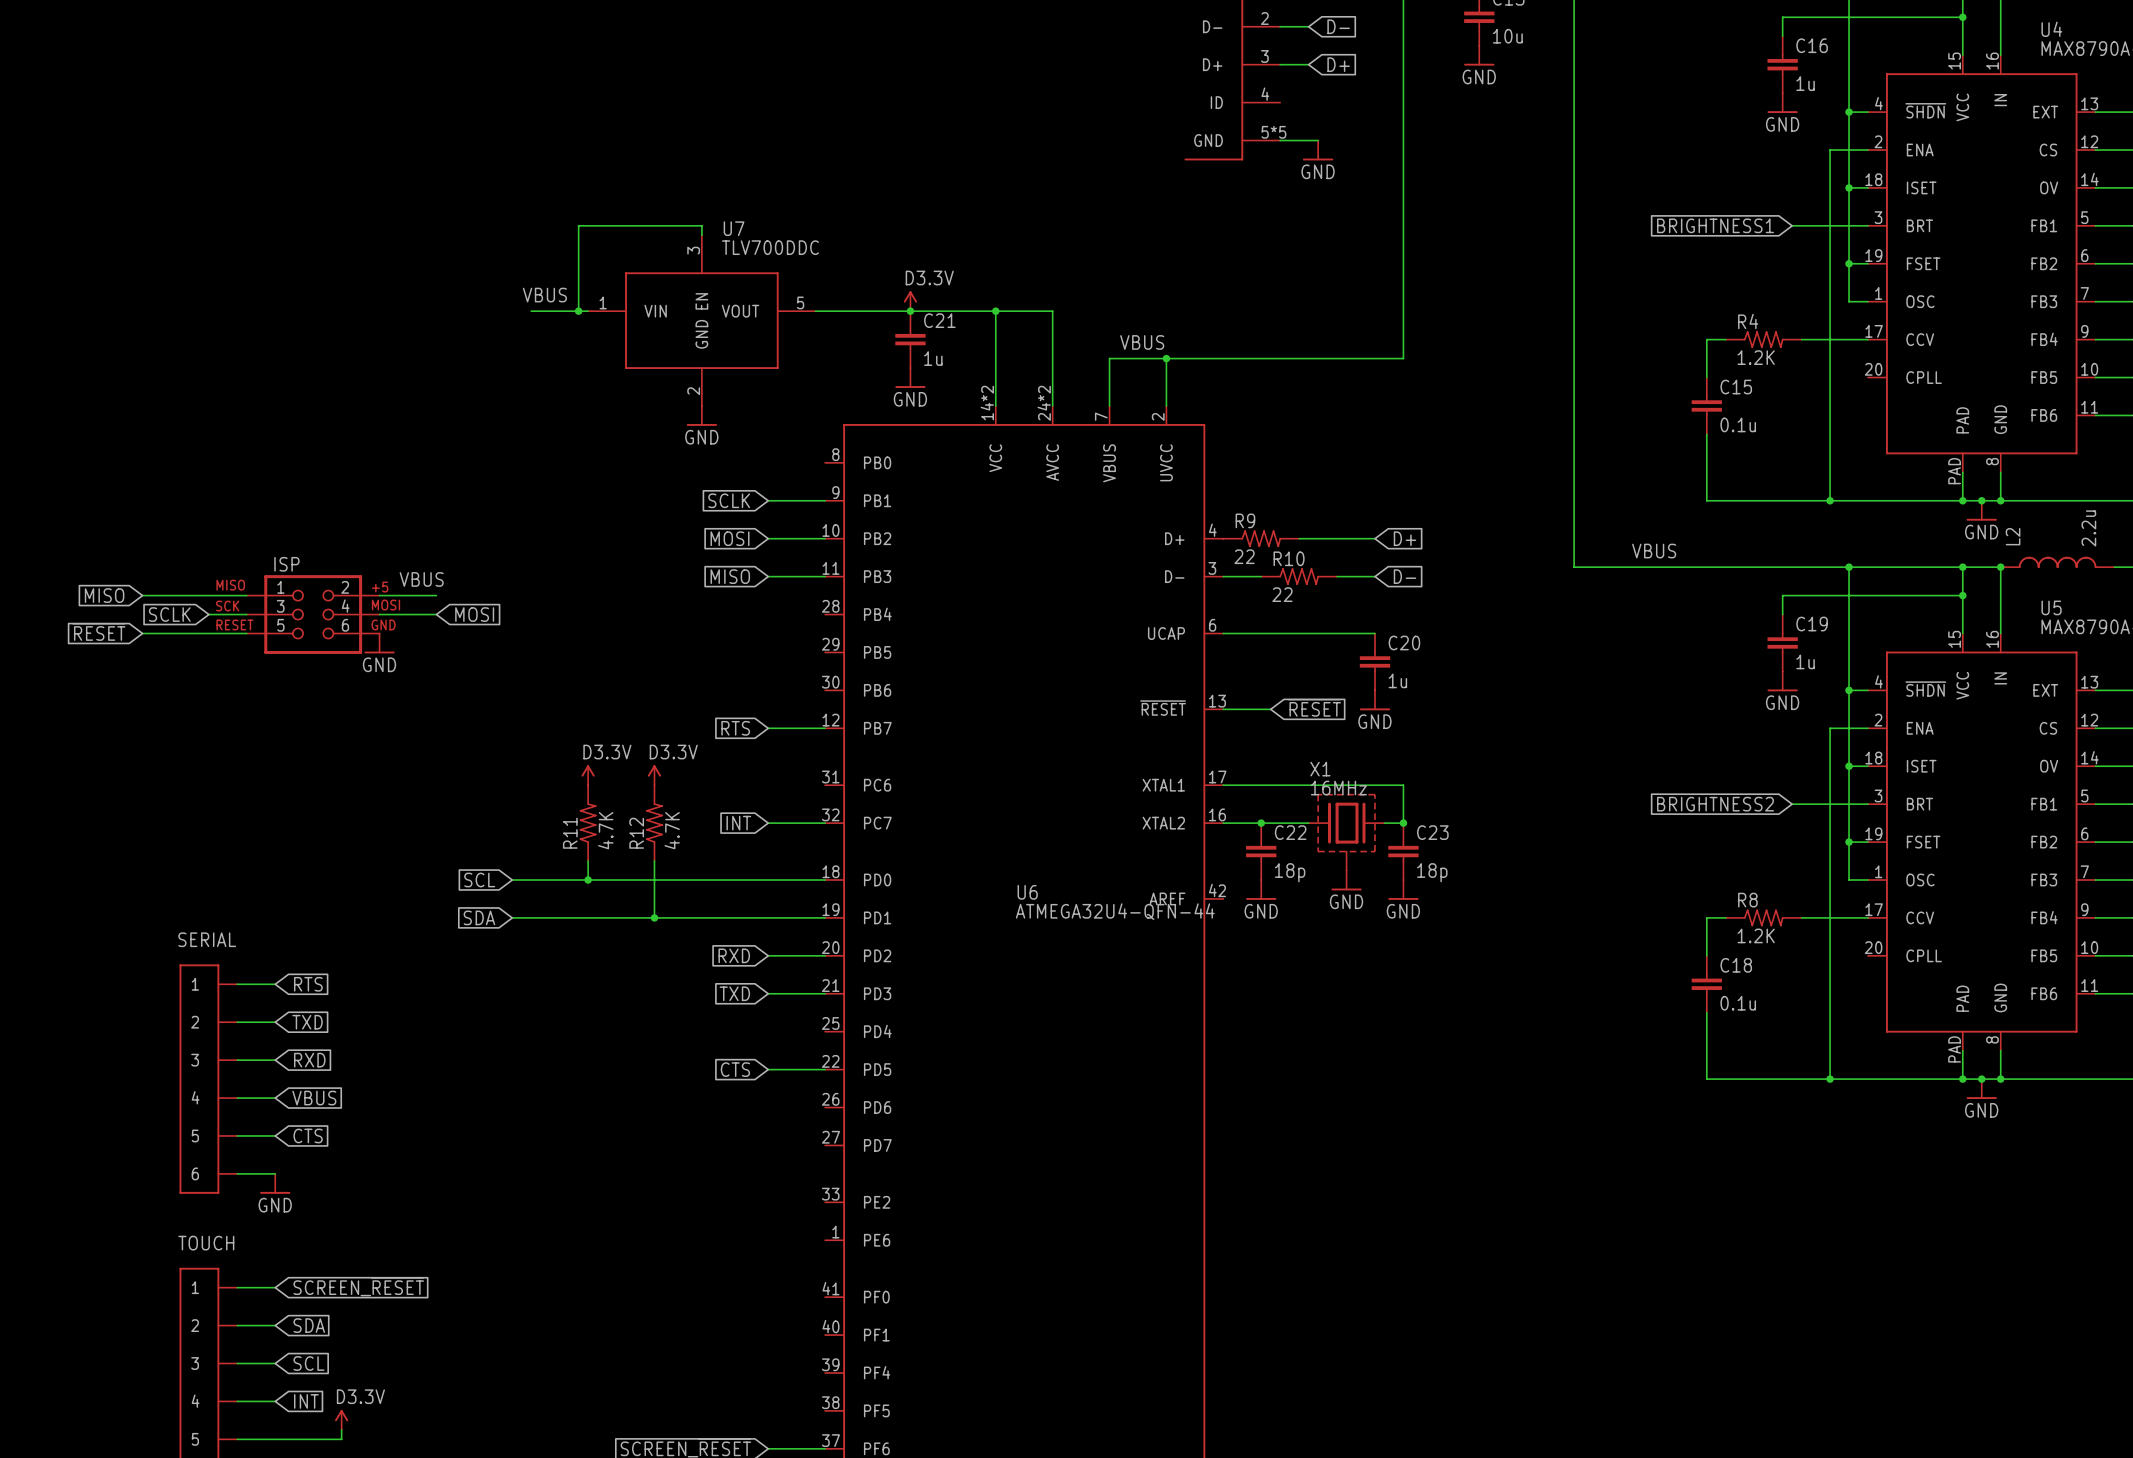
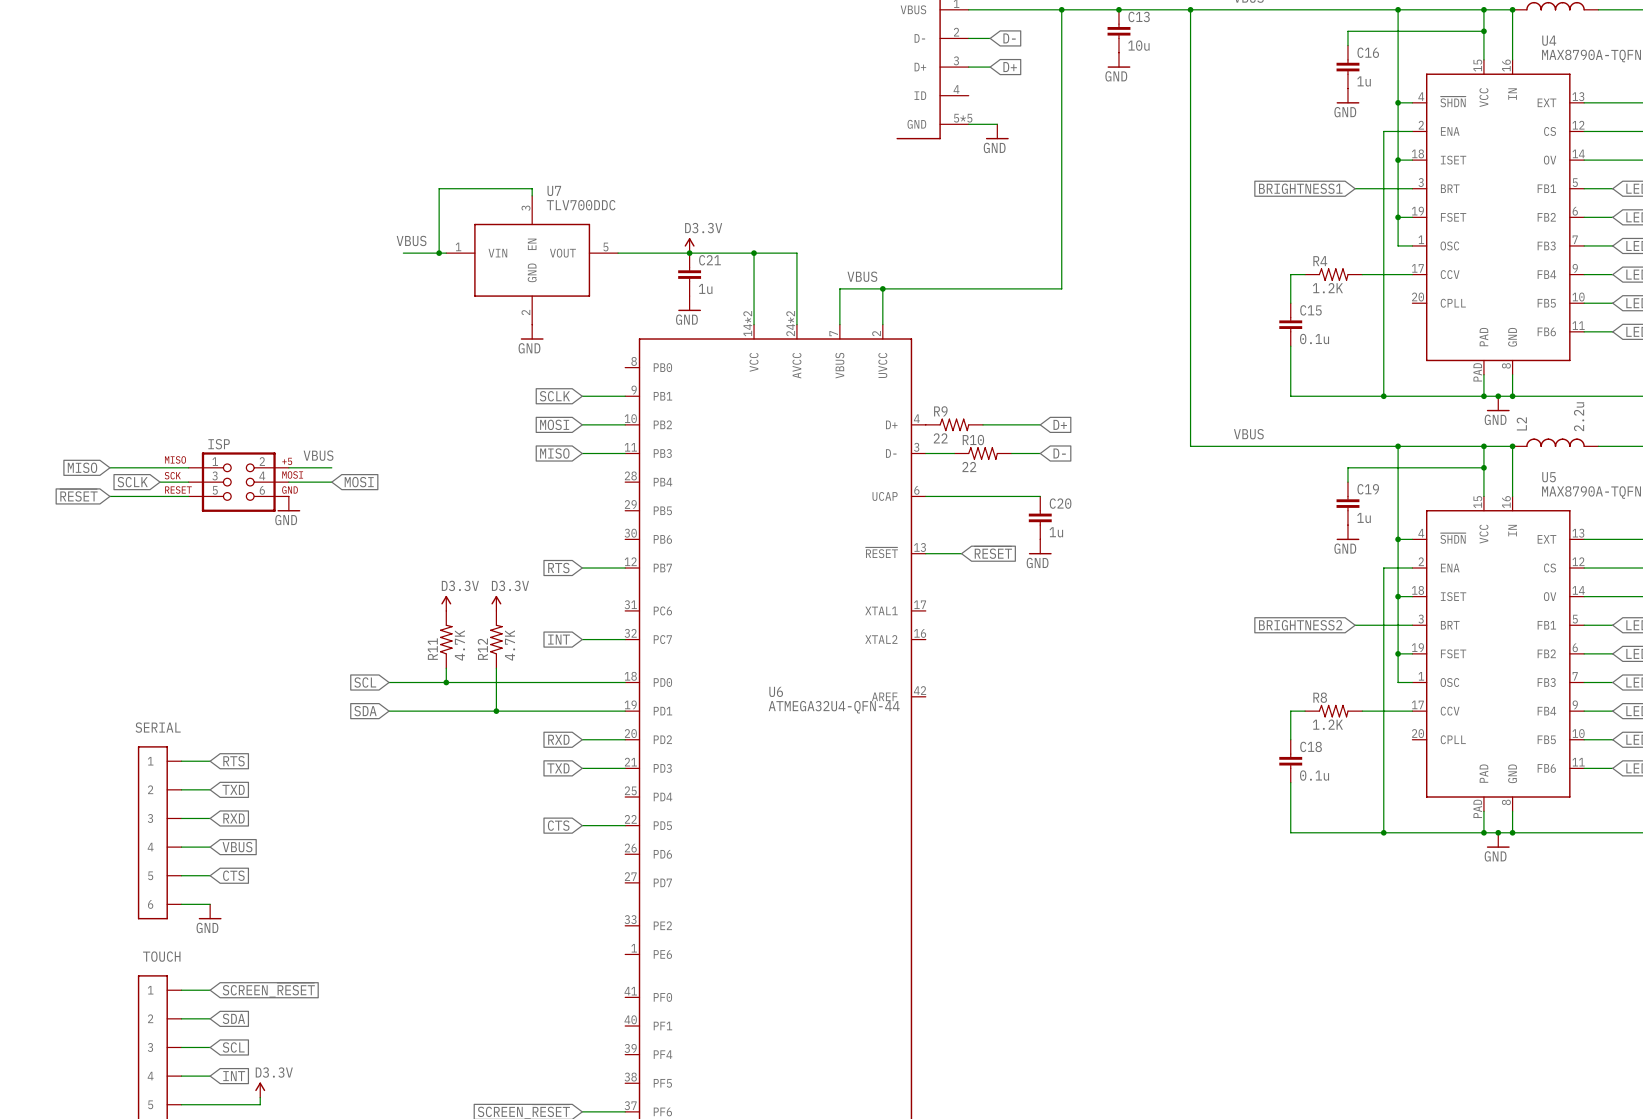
wire: (1223, 785) (1403, 785) (1403, 823) (1384, 823) -> none
wire: (1223, 823) (1308, 823) -> none
junction: (1261, 823) -> none
junction: (1403, 823) -> none
X1: 16MHz (1346, 832) -> none
C22: 18p (1261, 851) -> none
C23: 18p (1403, 851) -> none
power symbol: GND (1346, 880) -> none
power symbol: GND (1261, 889) -> none
power symbol: GND (1403, 889) -> none

